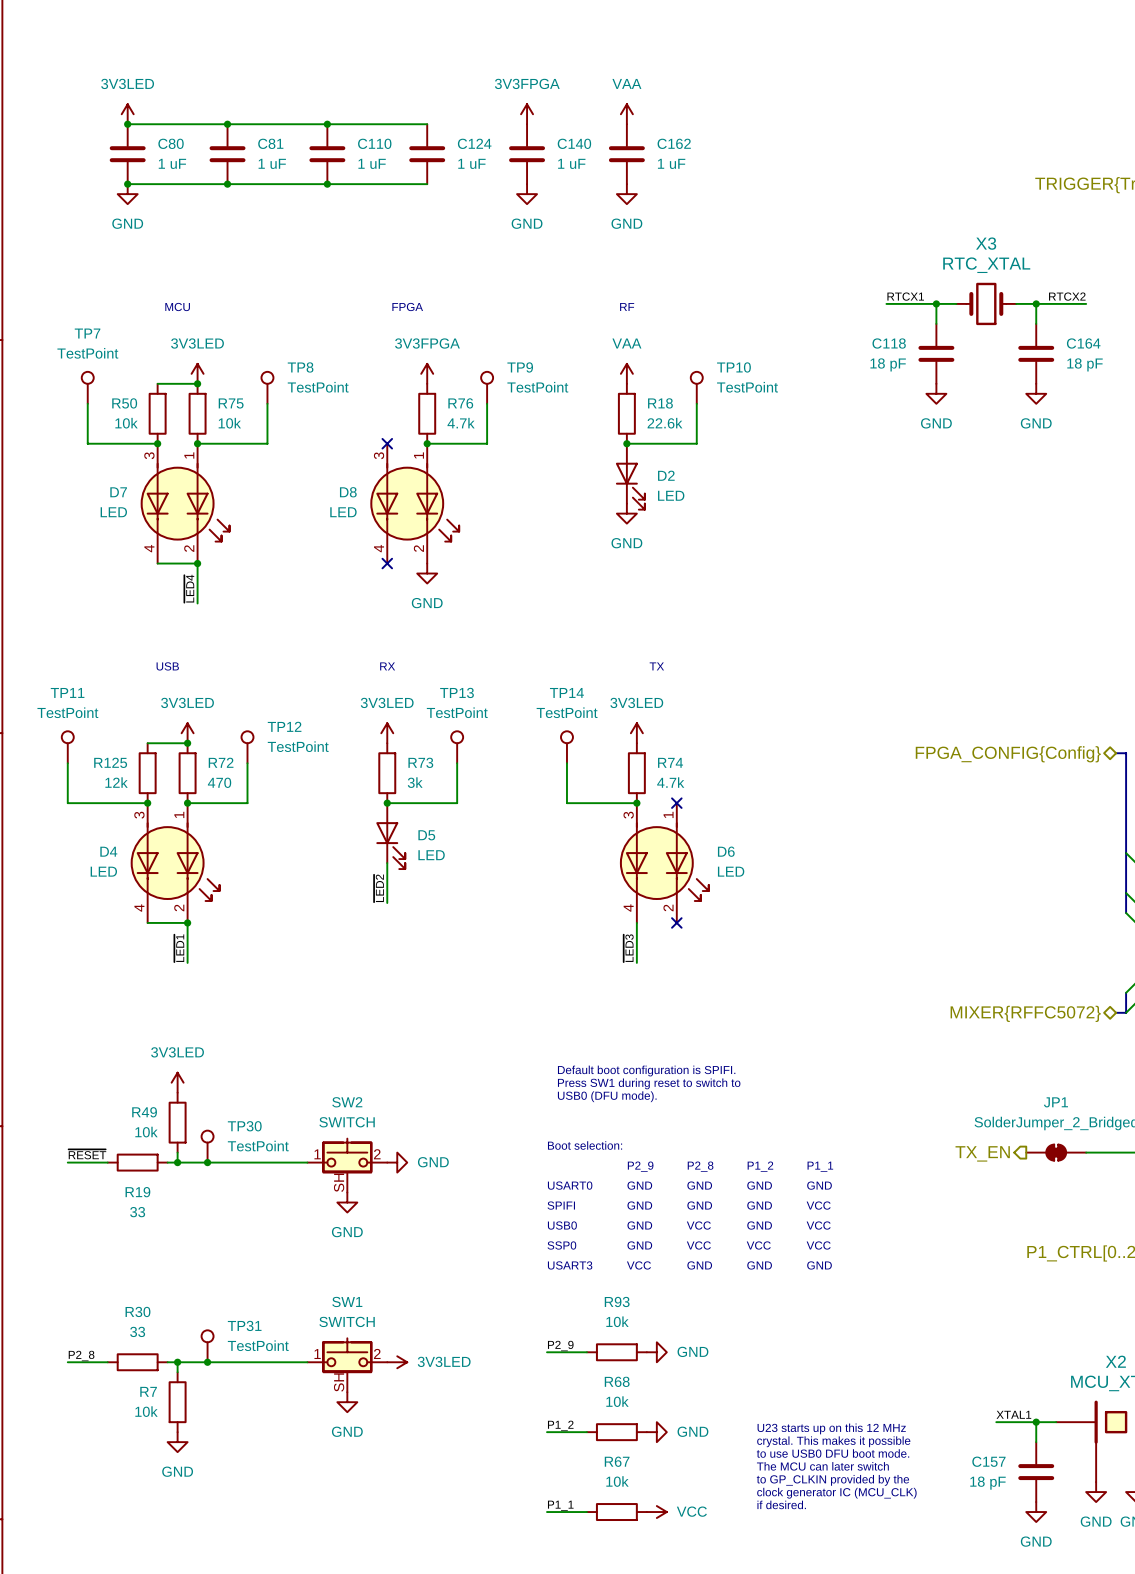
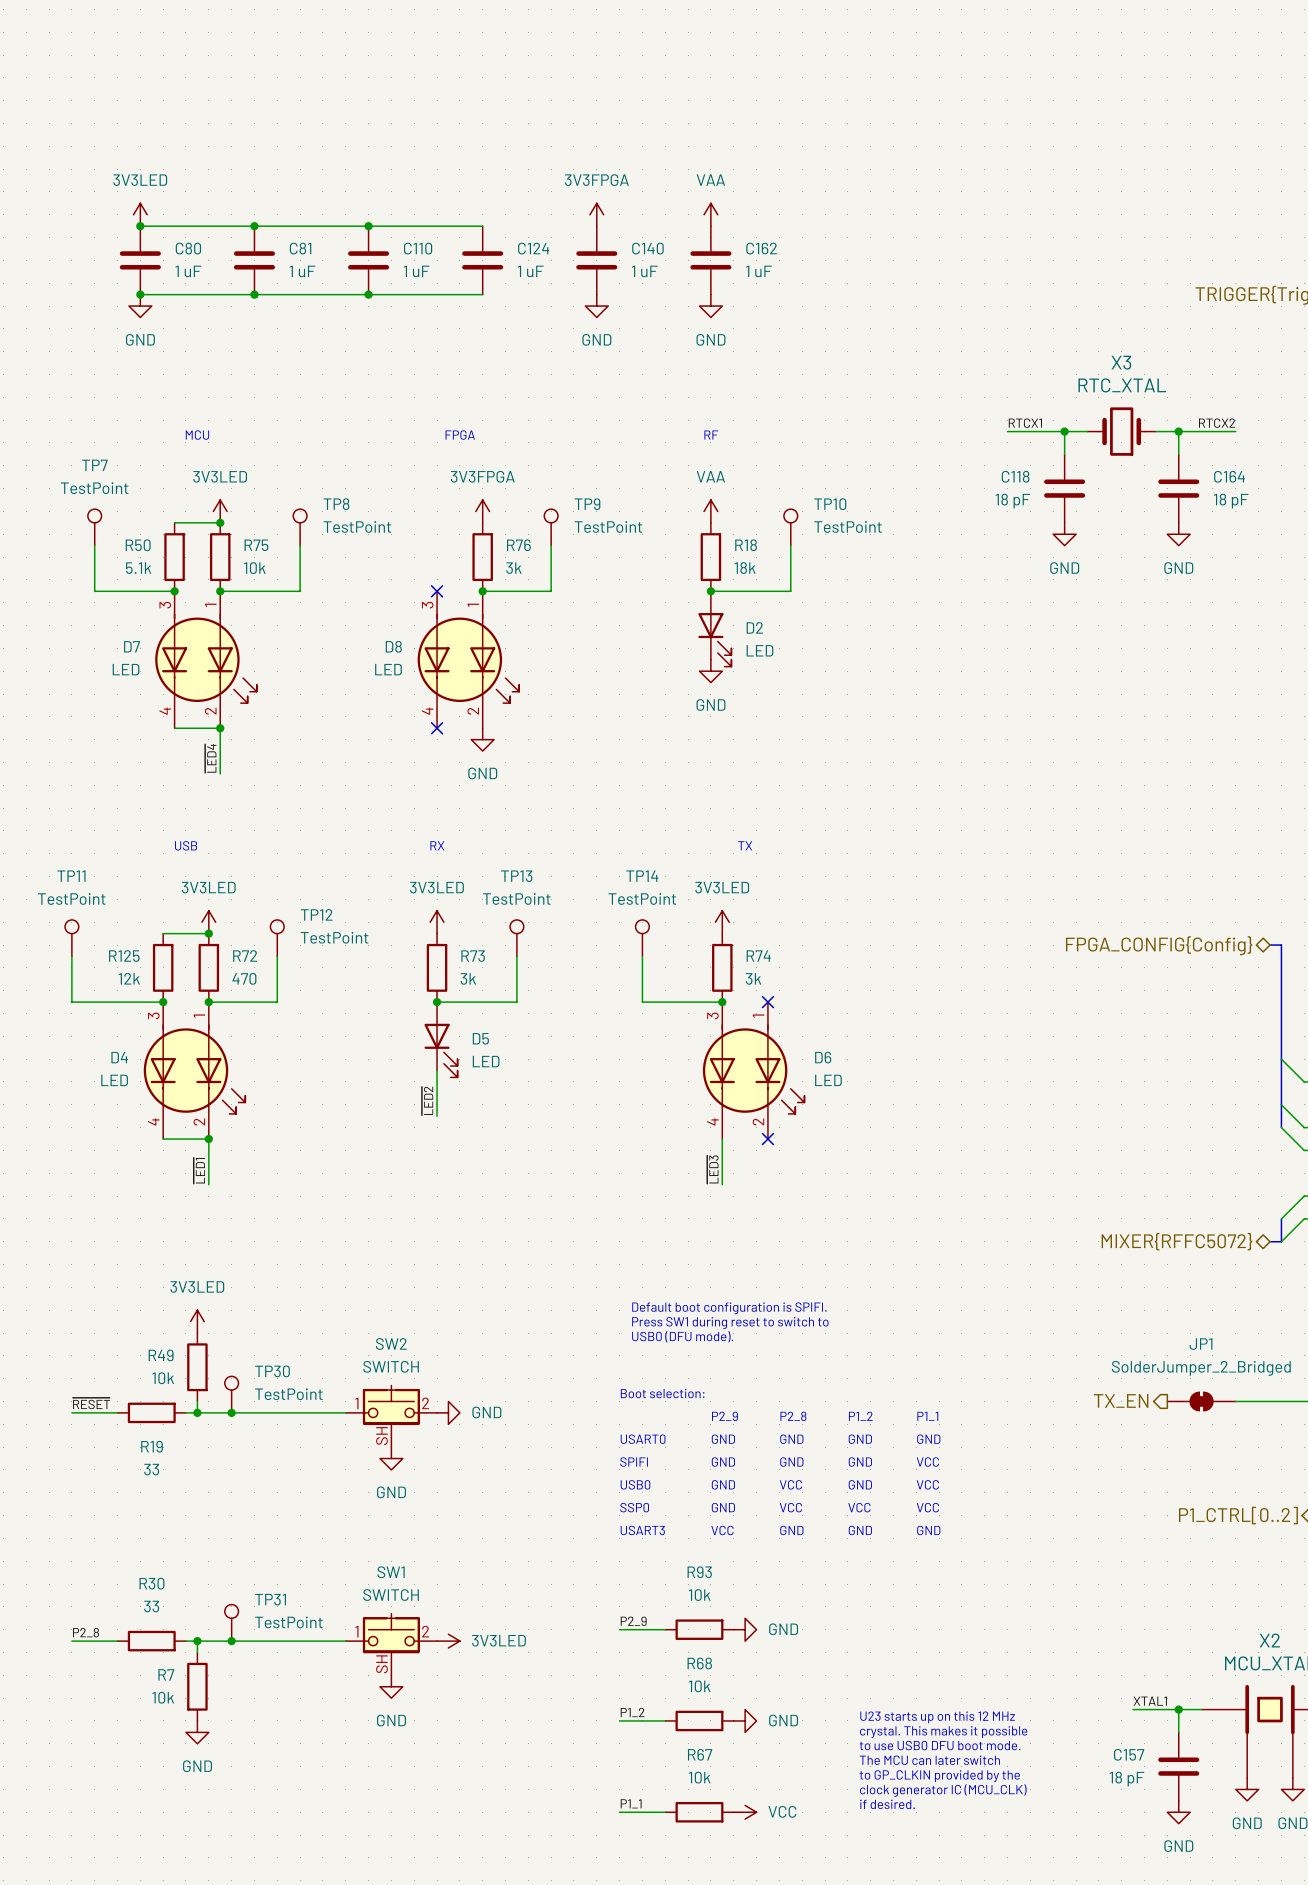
R50 value: 10k (126, 423) -> 5.1k (138, 568)
R76 value: 4.7k (461, 423) -> 3k (513, 568)
R18 value: 22.6k (664, 423) -> 18k (745, 568)
R74 value: 4.7k (670, 782) -> 3k (753, 978)

